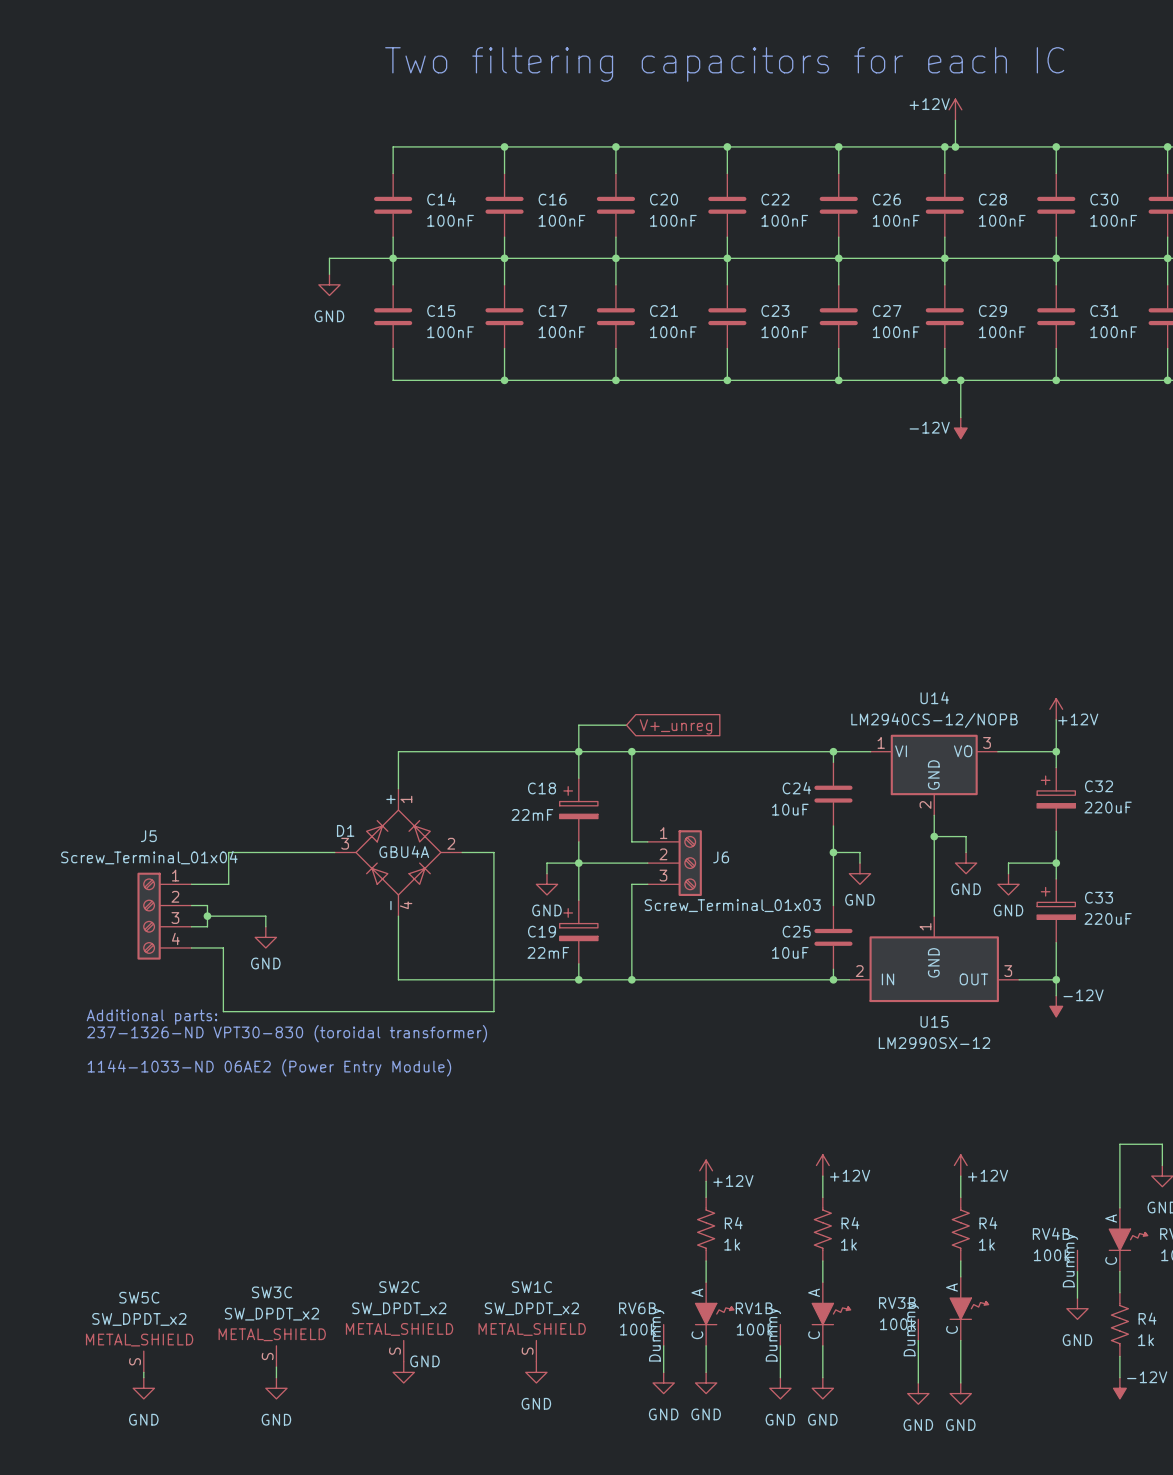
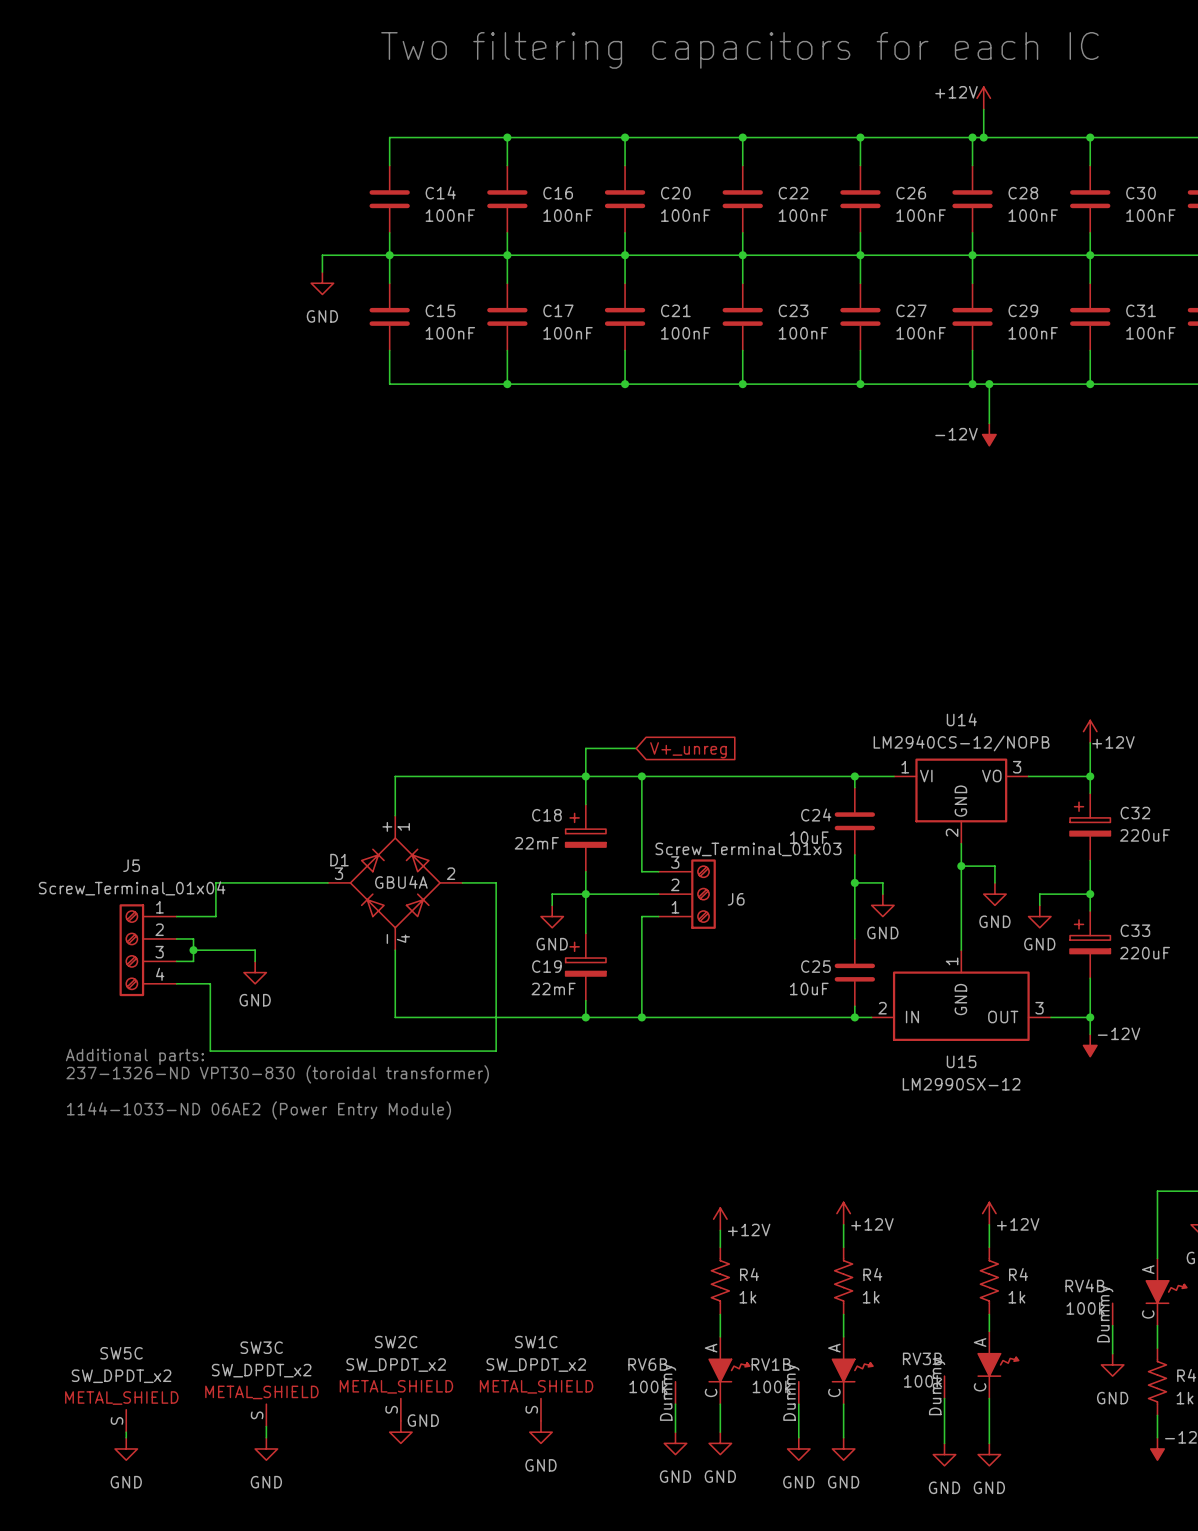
J6 flip: as is (690, 863) -> up-down (703, 894)

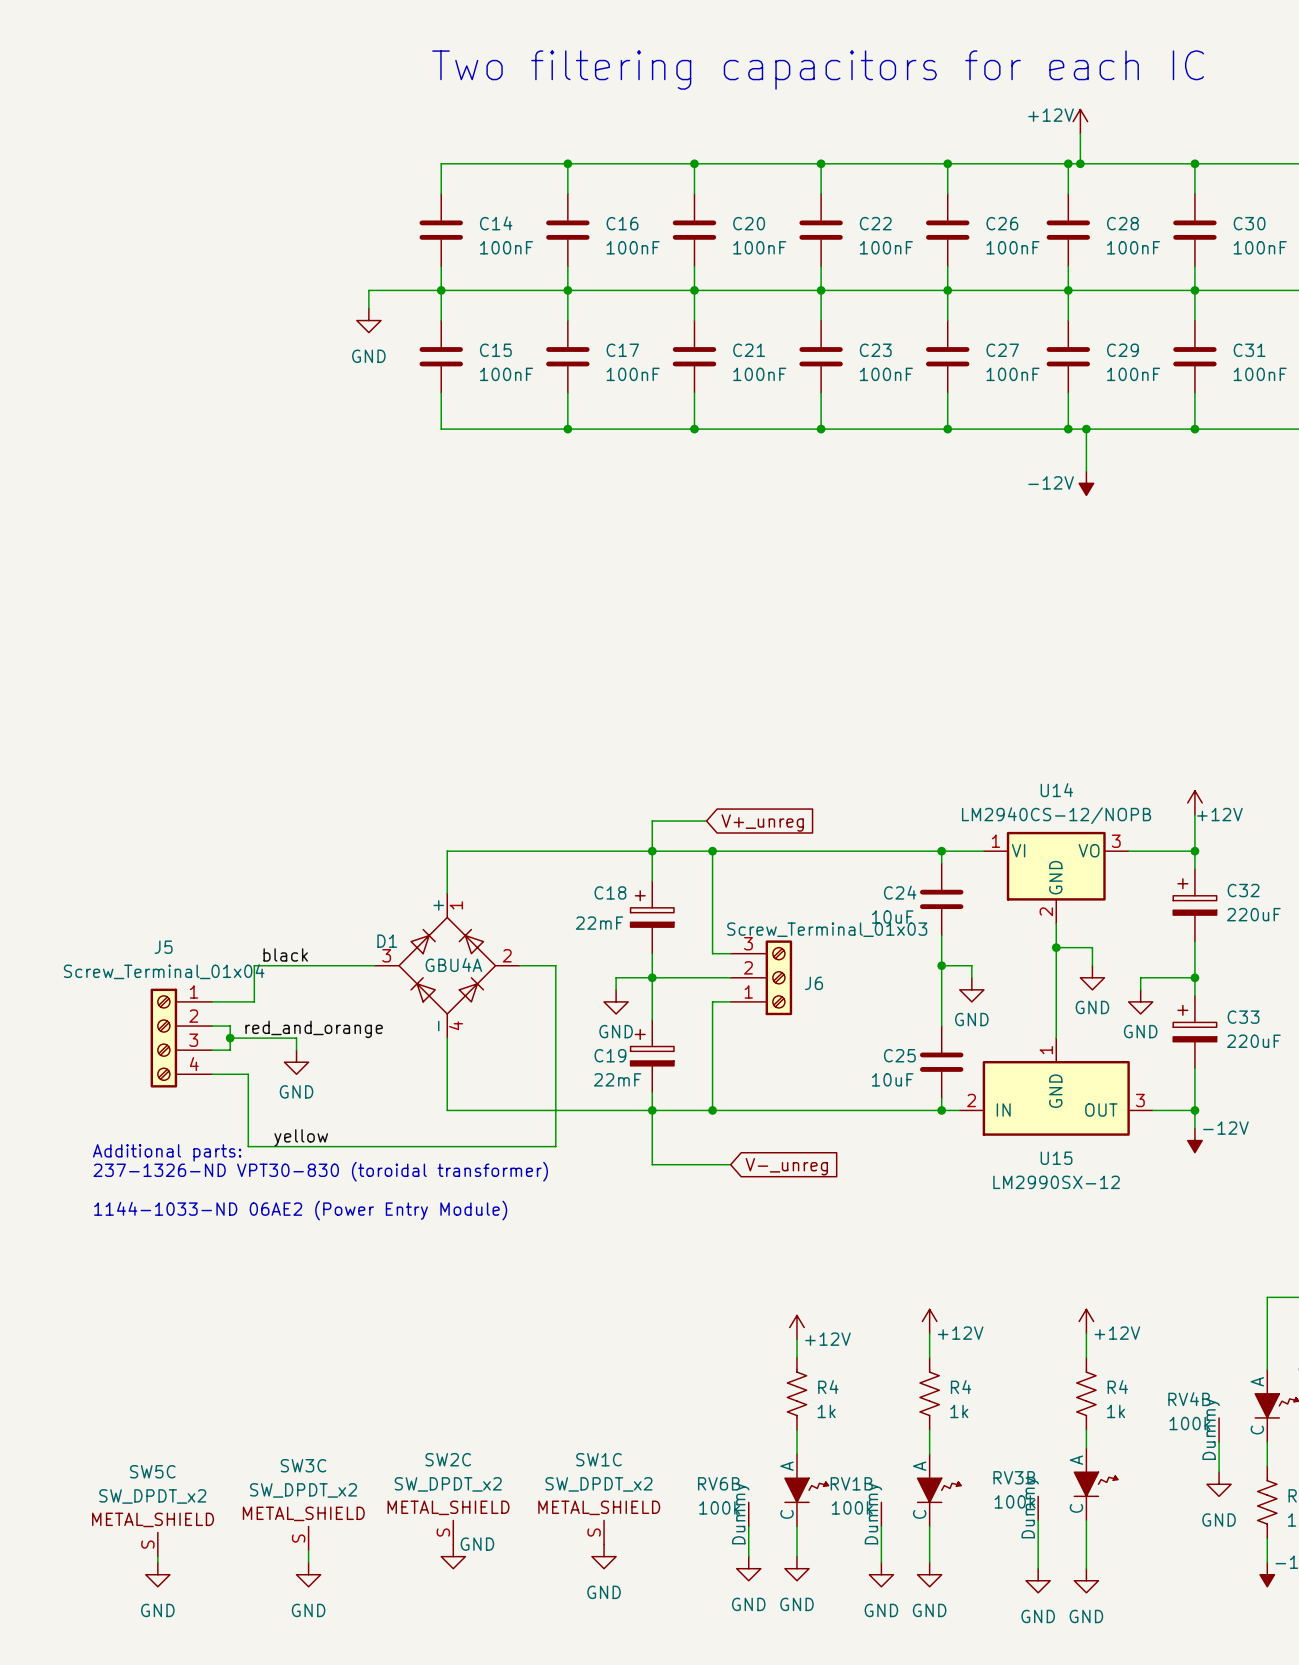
label: none -> black (285, 954)
label: none -> red_and_orange (314, 1029)
wire: none -> (652, 1110) (652, 1164) (730, 1164)
label: none -> yellow (301, 1137)
global label: none -> V-_unreg (786, 1166)

